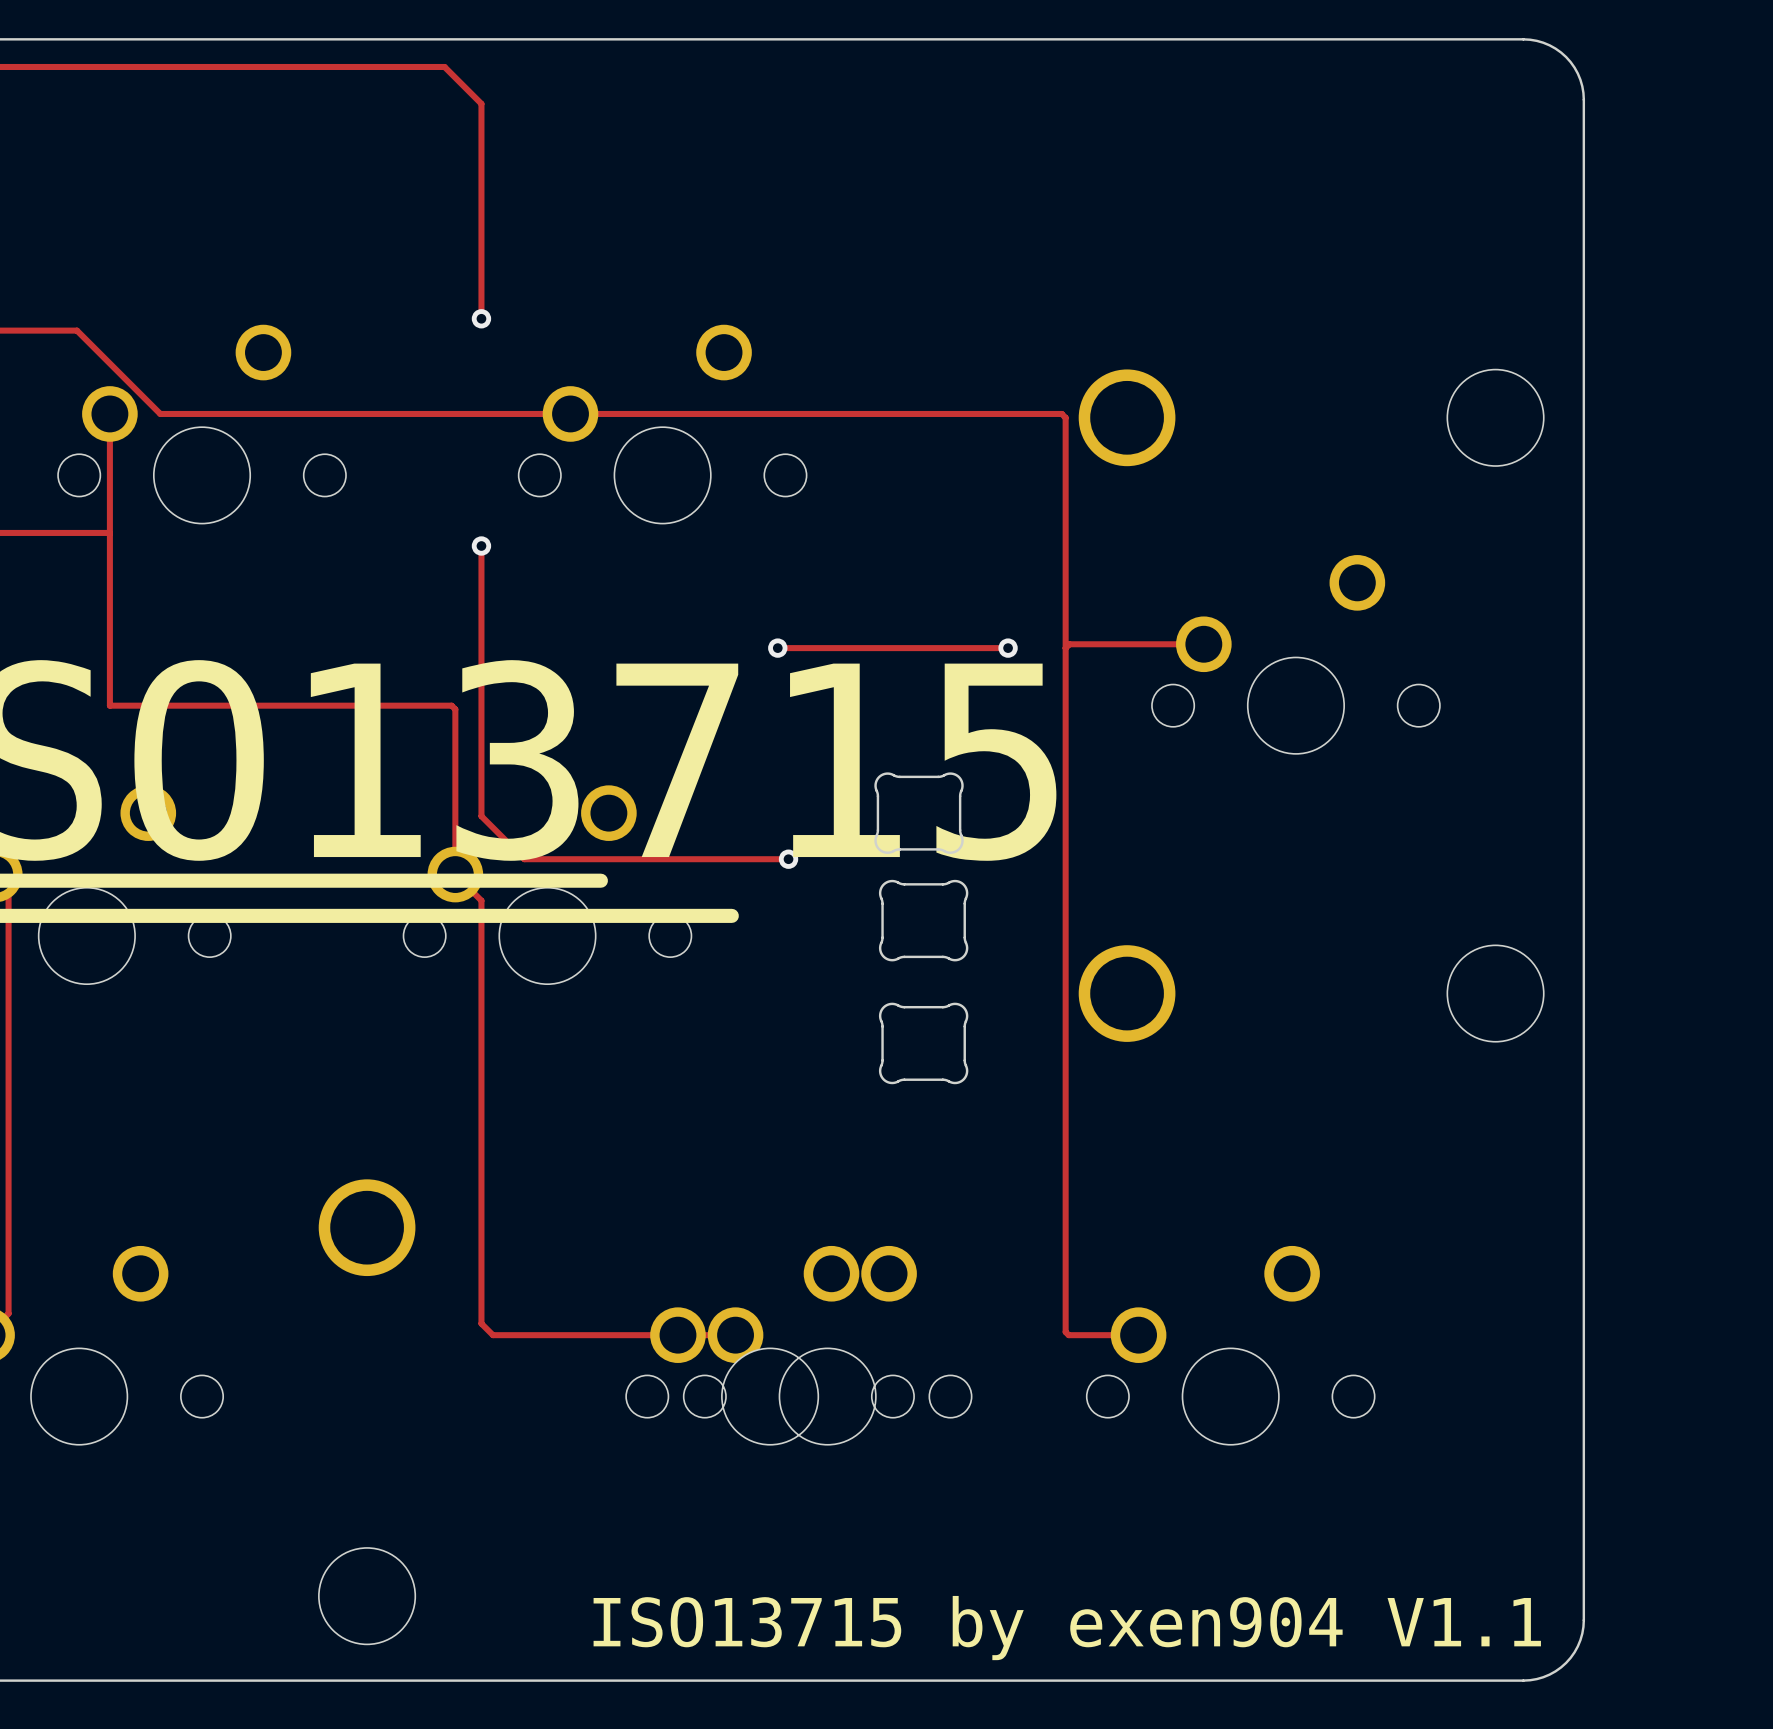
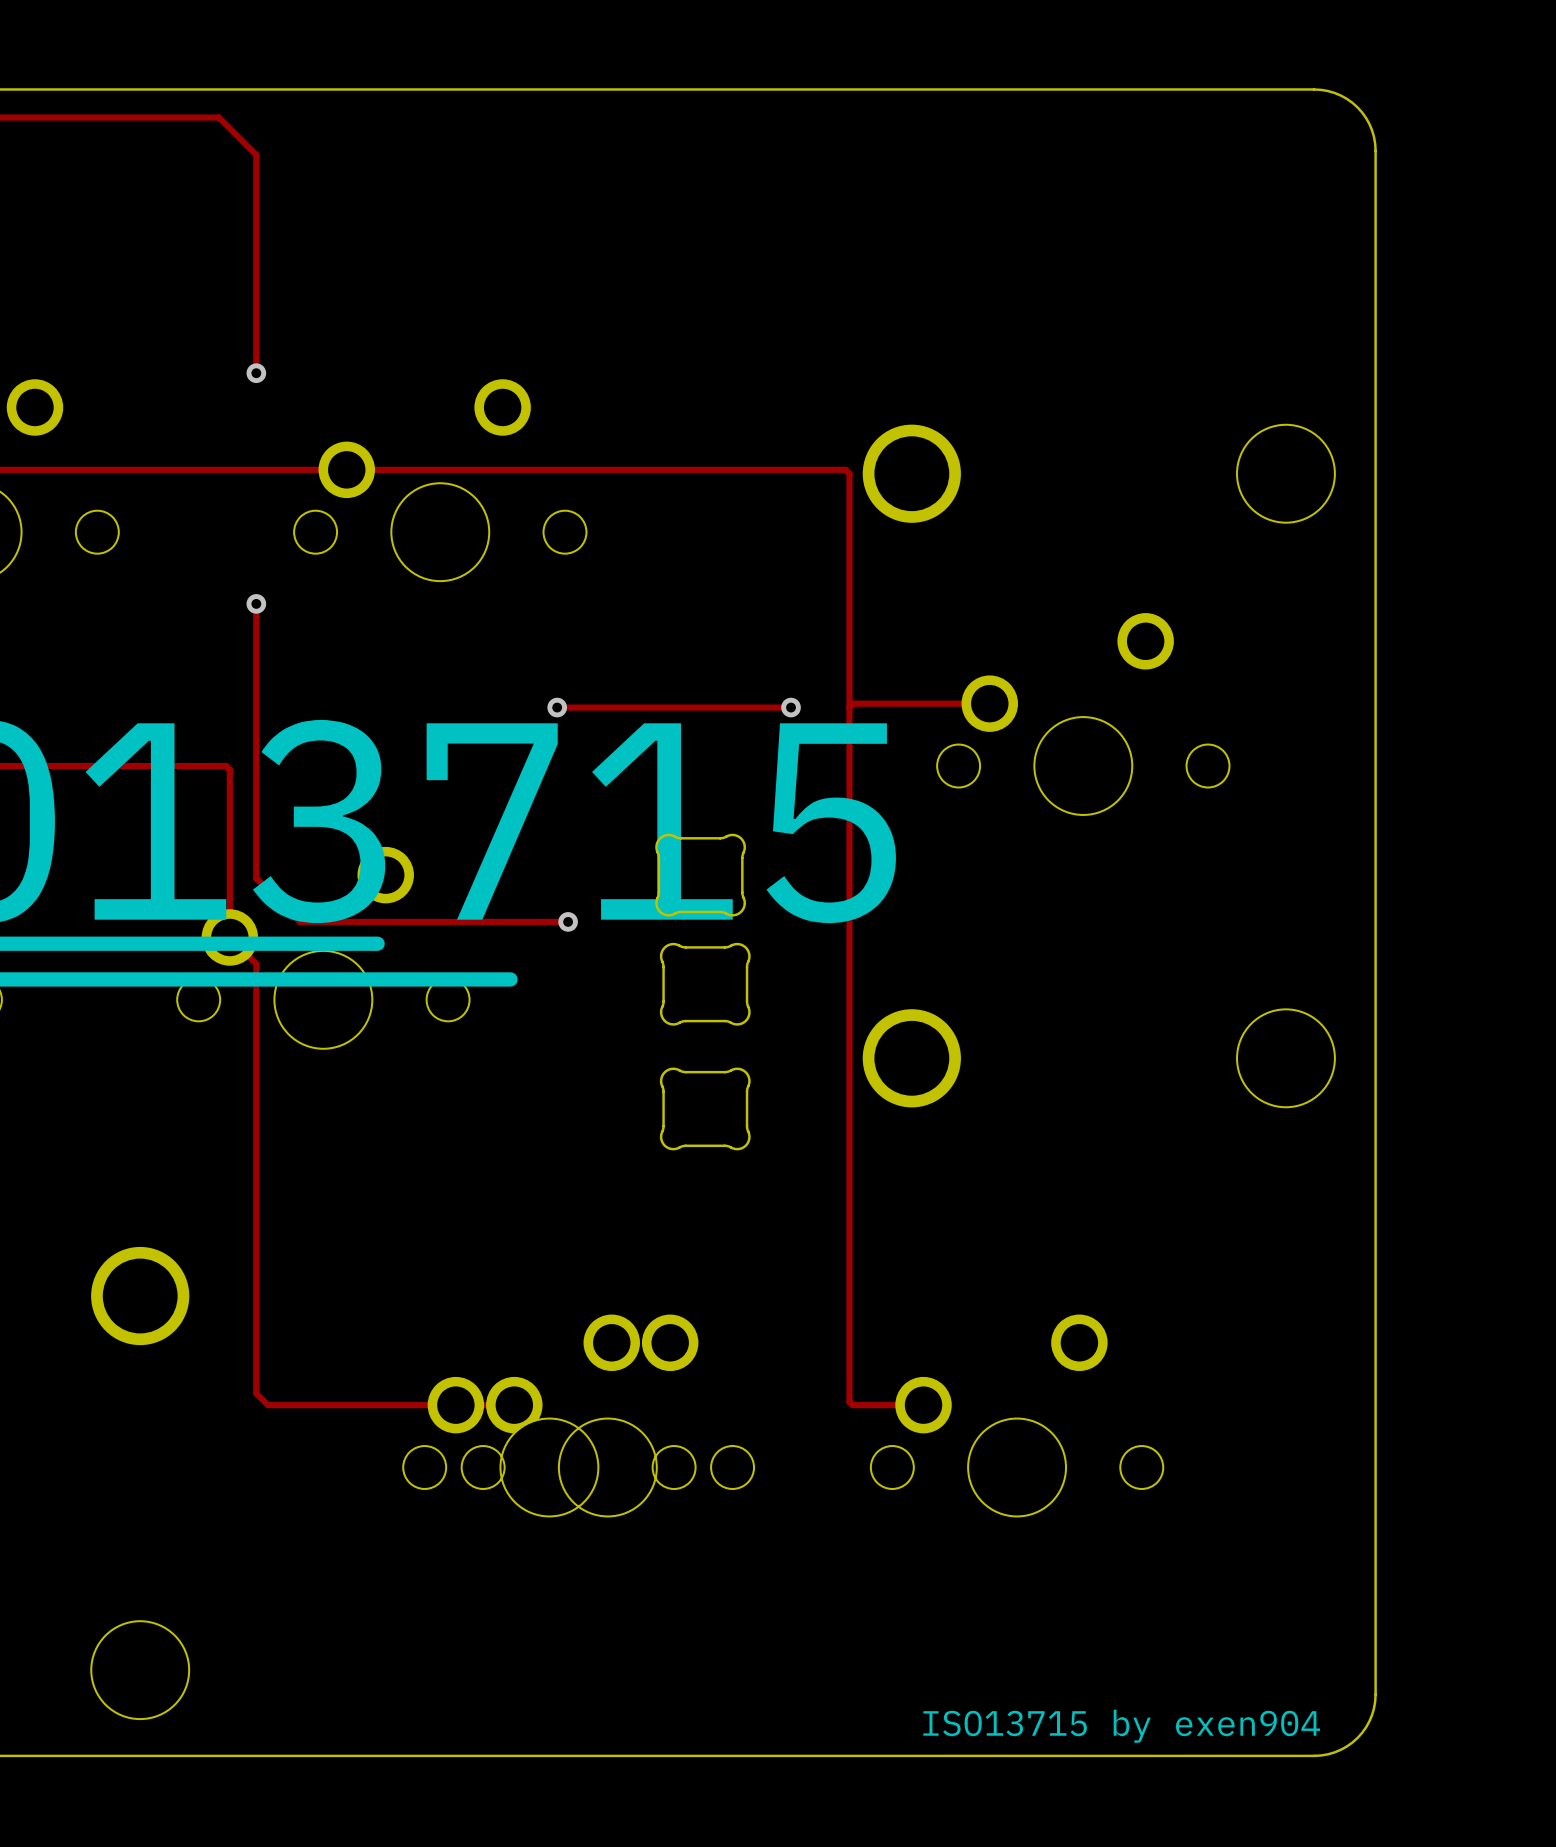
text: ISO13715 by exen904 V1.1 (1067, 1628) -> ISO13715 by exen904 (1121, 1726)

